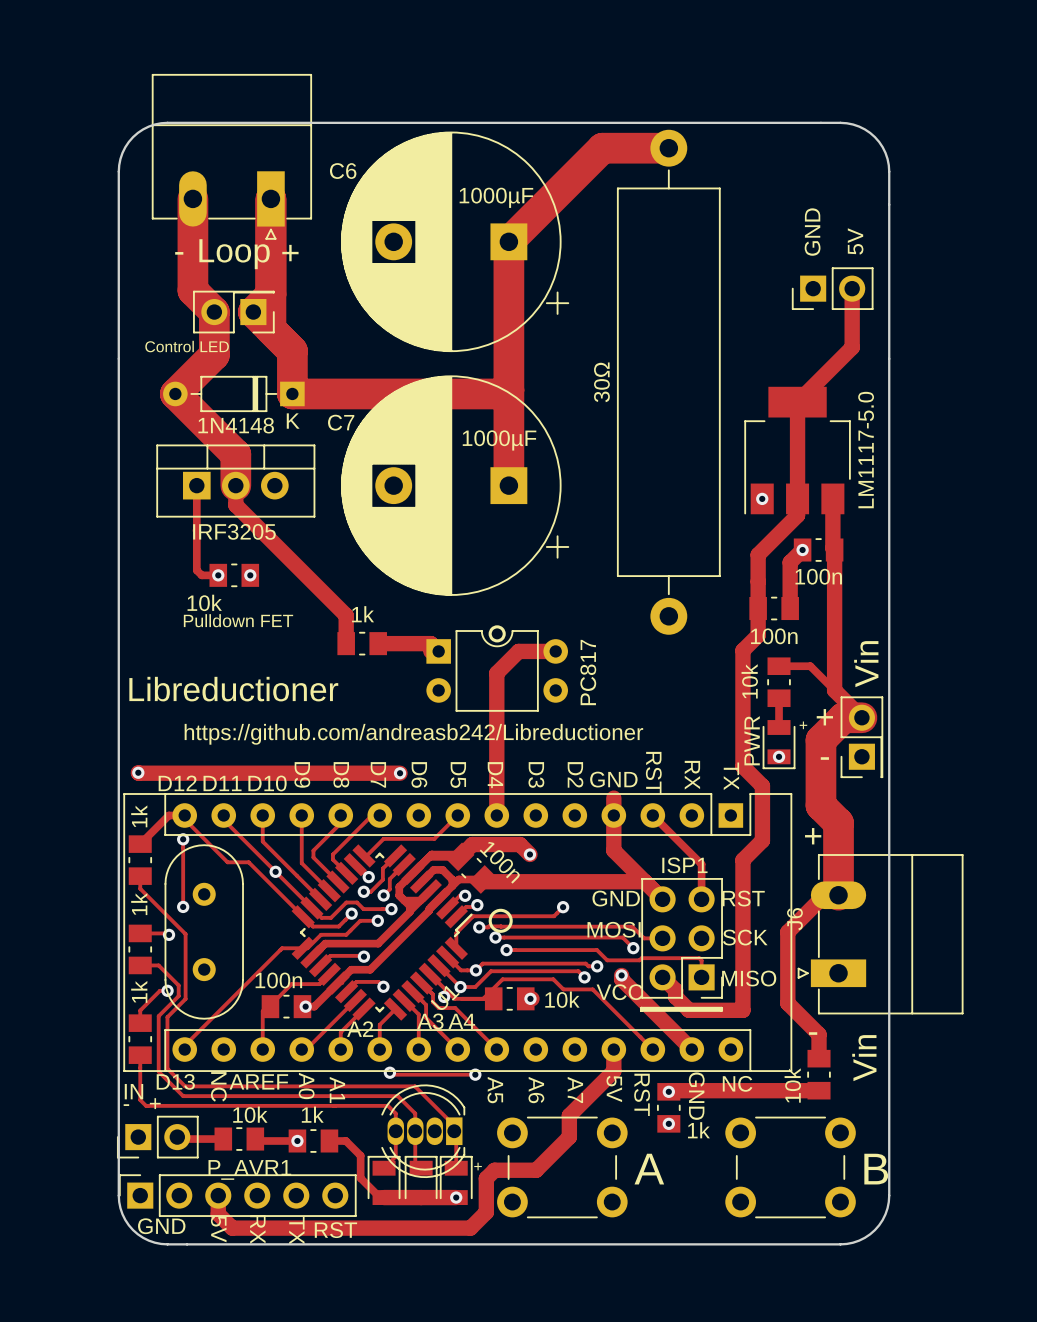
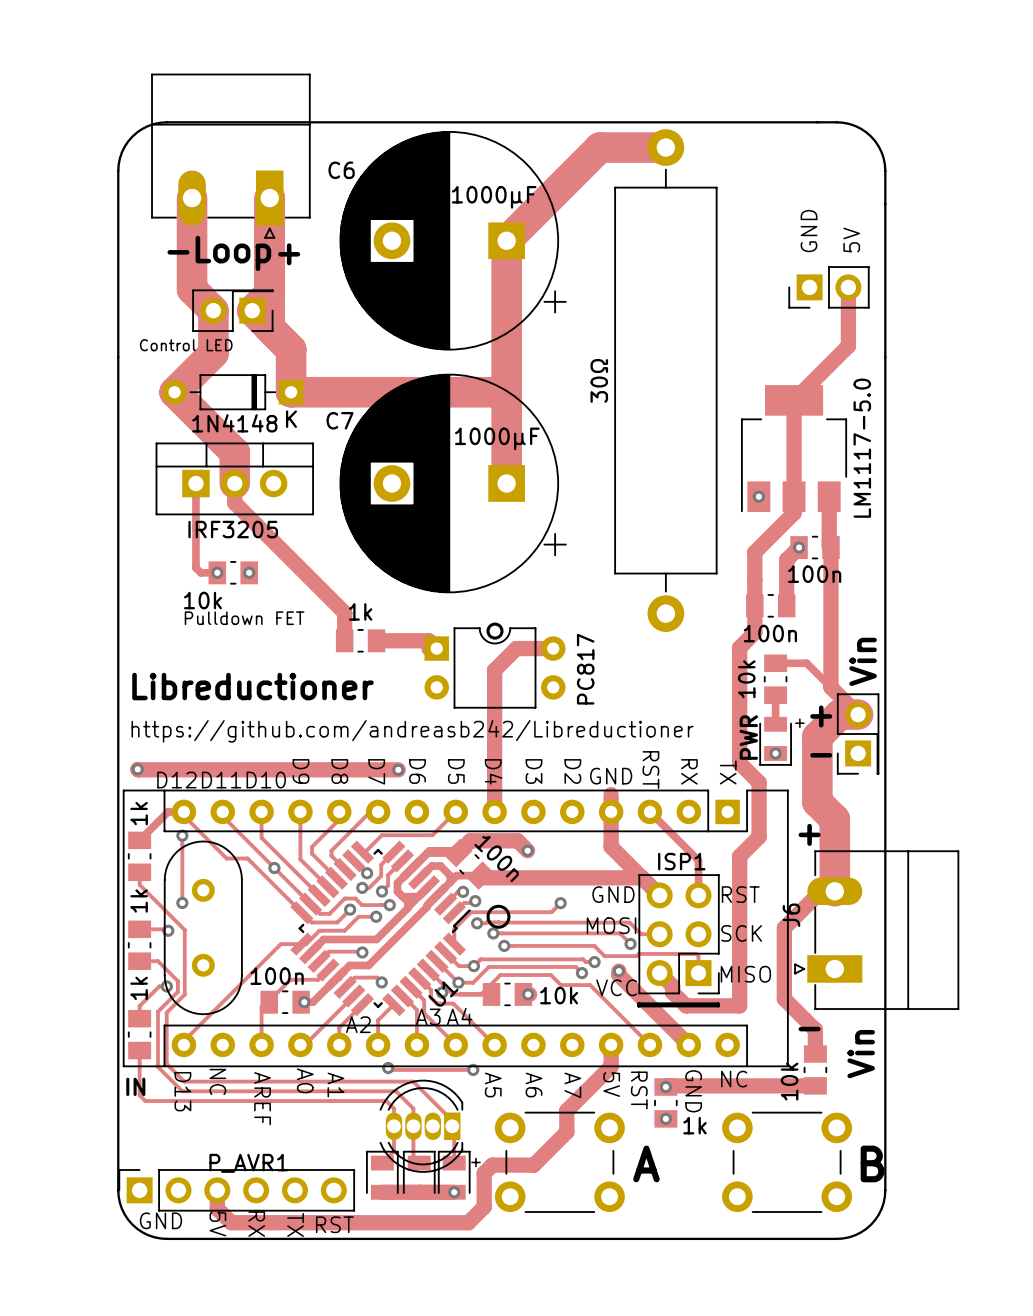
text rotation: 0° (175, 1081) -> 90° clockwise (182, 1091)
text rotation: 0° (258, 1081) -> 90° clockwise (262, 1098)
text: - + (142, 1103) -> none
part: (157, 1137) -> none
track: (177, 1137) (179, 1139) (223, 1139) -> none
part: 10k (239, 1139) -> none
track: (255, 1139) (257, 1140) (297, 1140) -> none
via: (297, 1140) -> none
part: 1k (313, 1140) -> none
track: (329, 1140) (345, 1140) (360, 1155) (360, 1178) (379, 1197) (384, 1197) -> none

